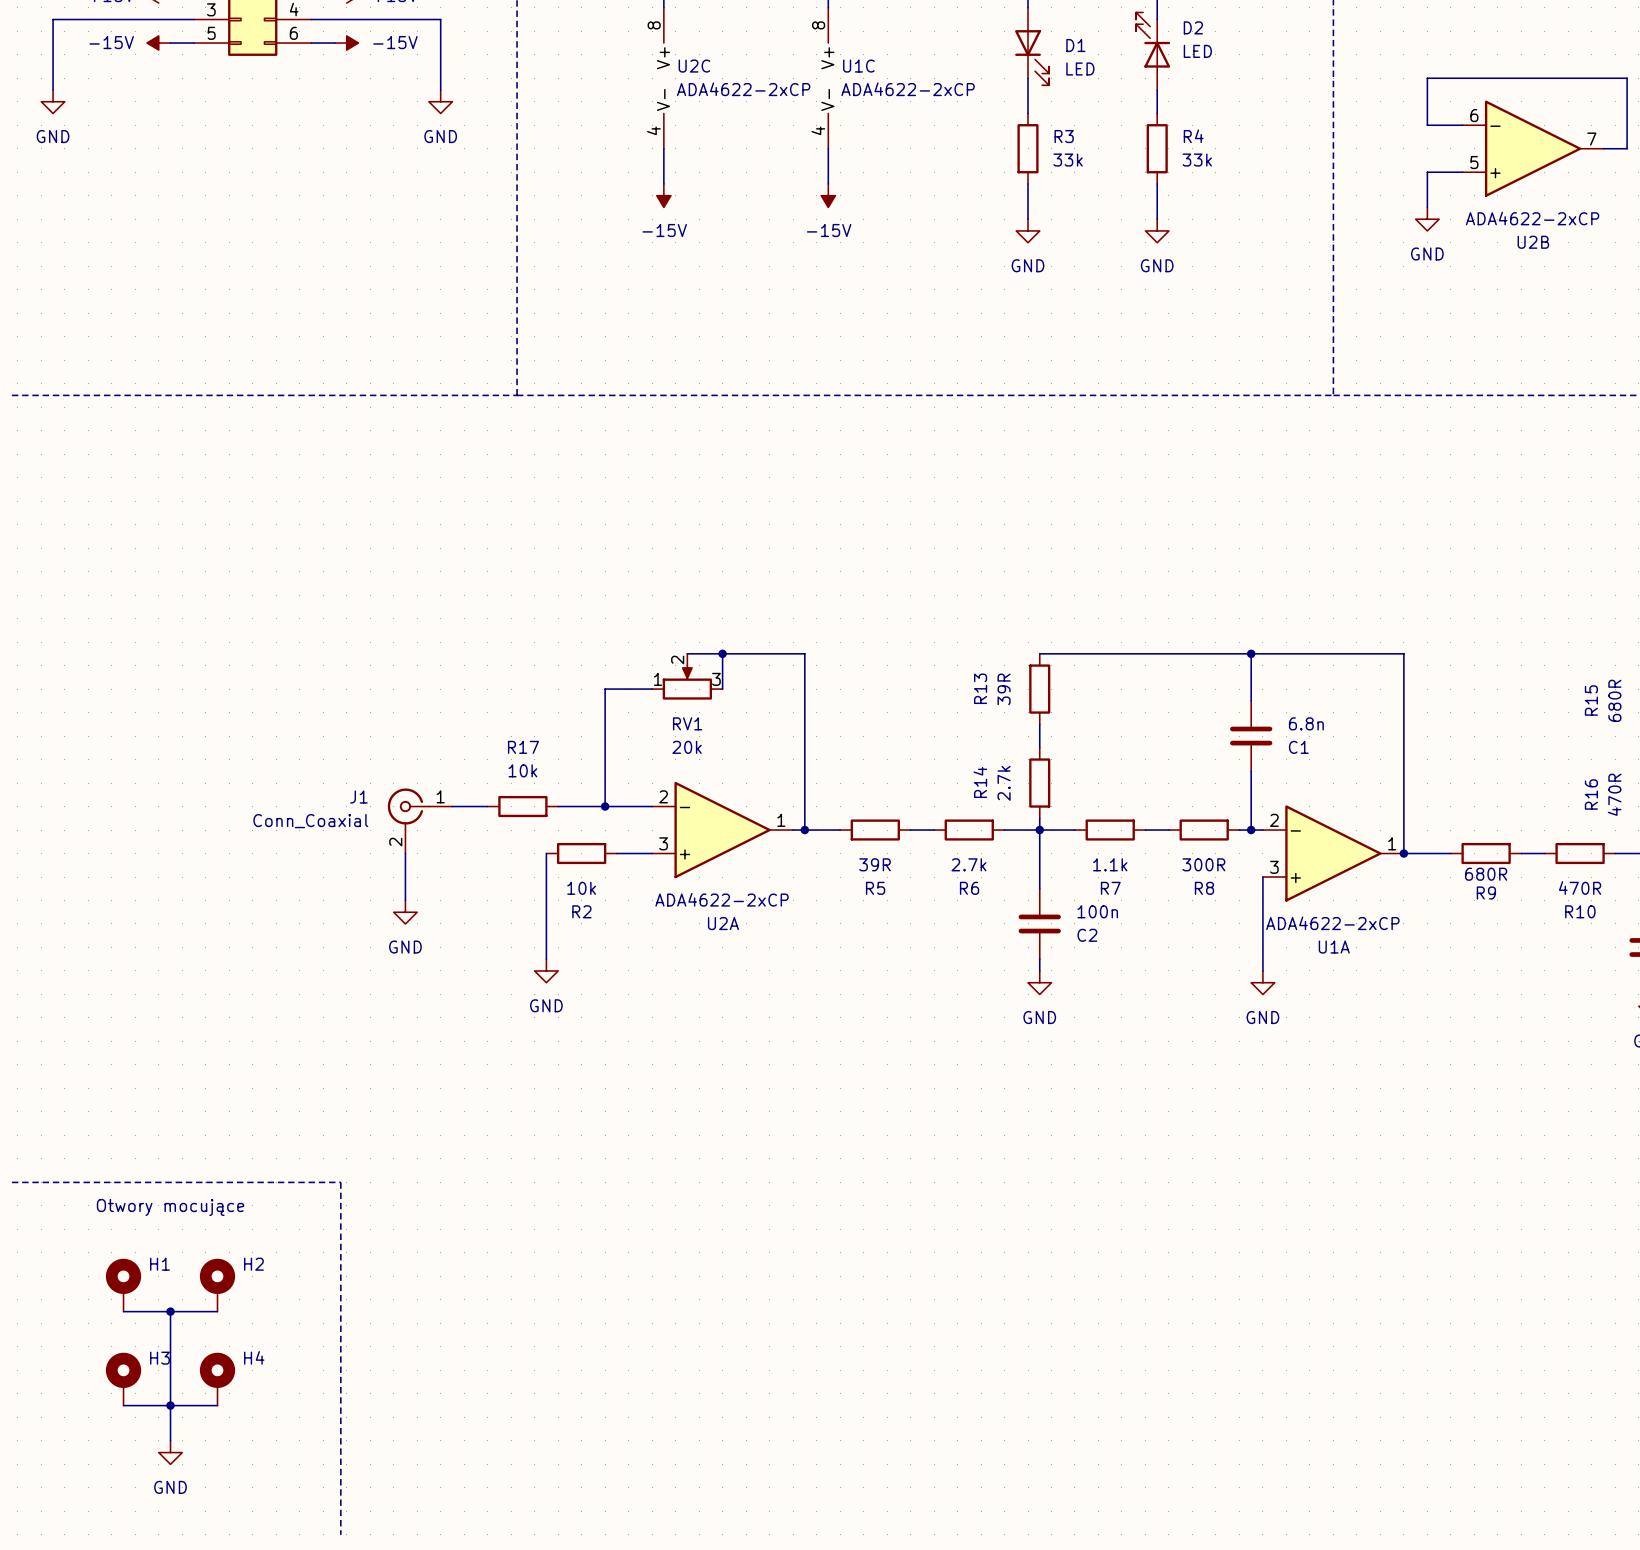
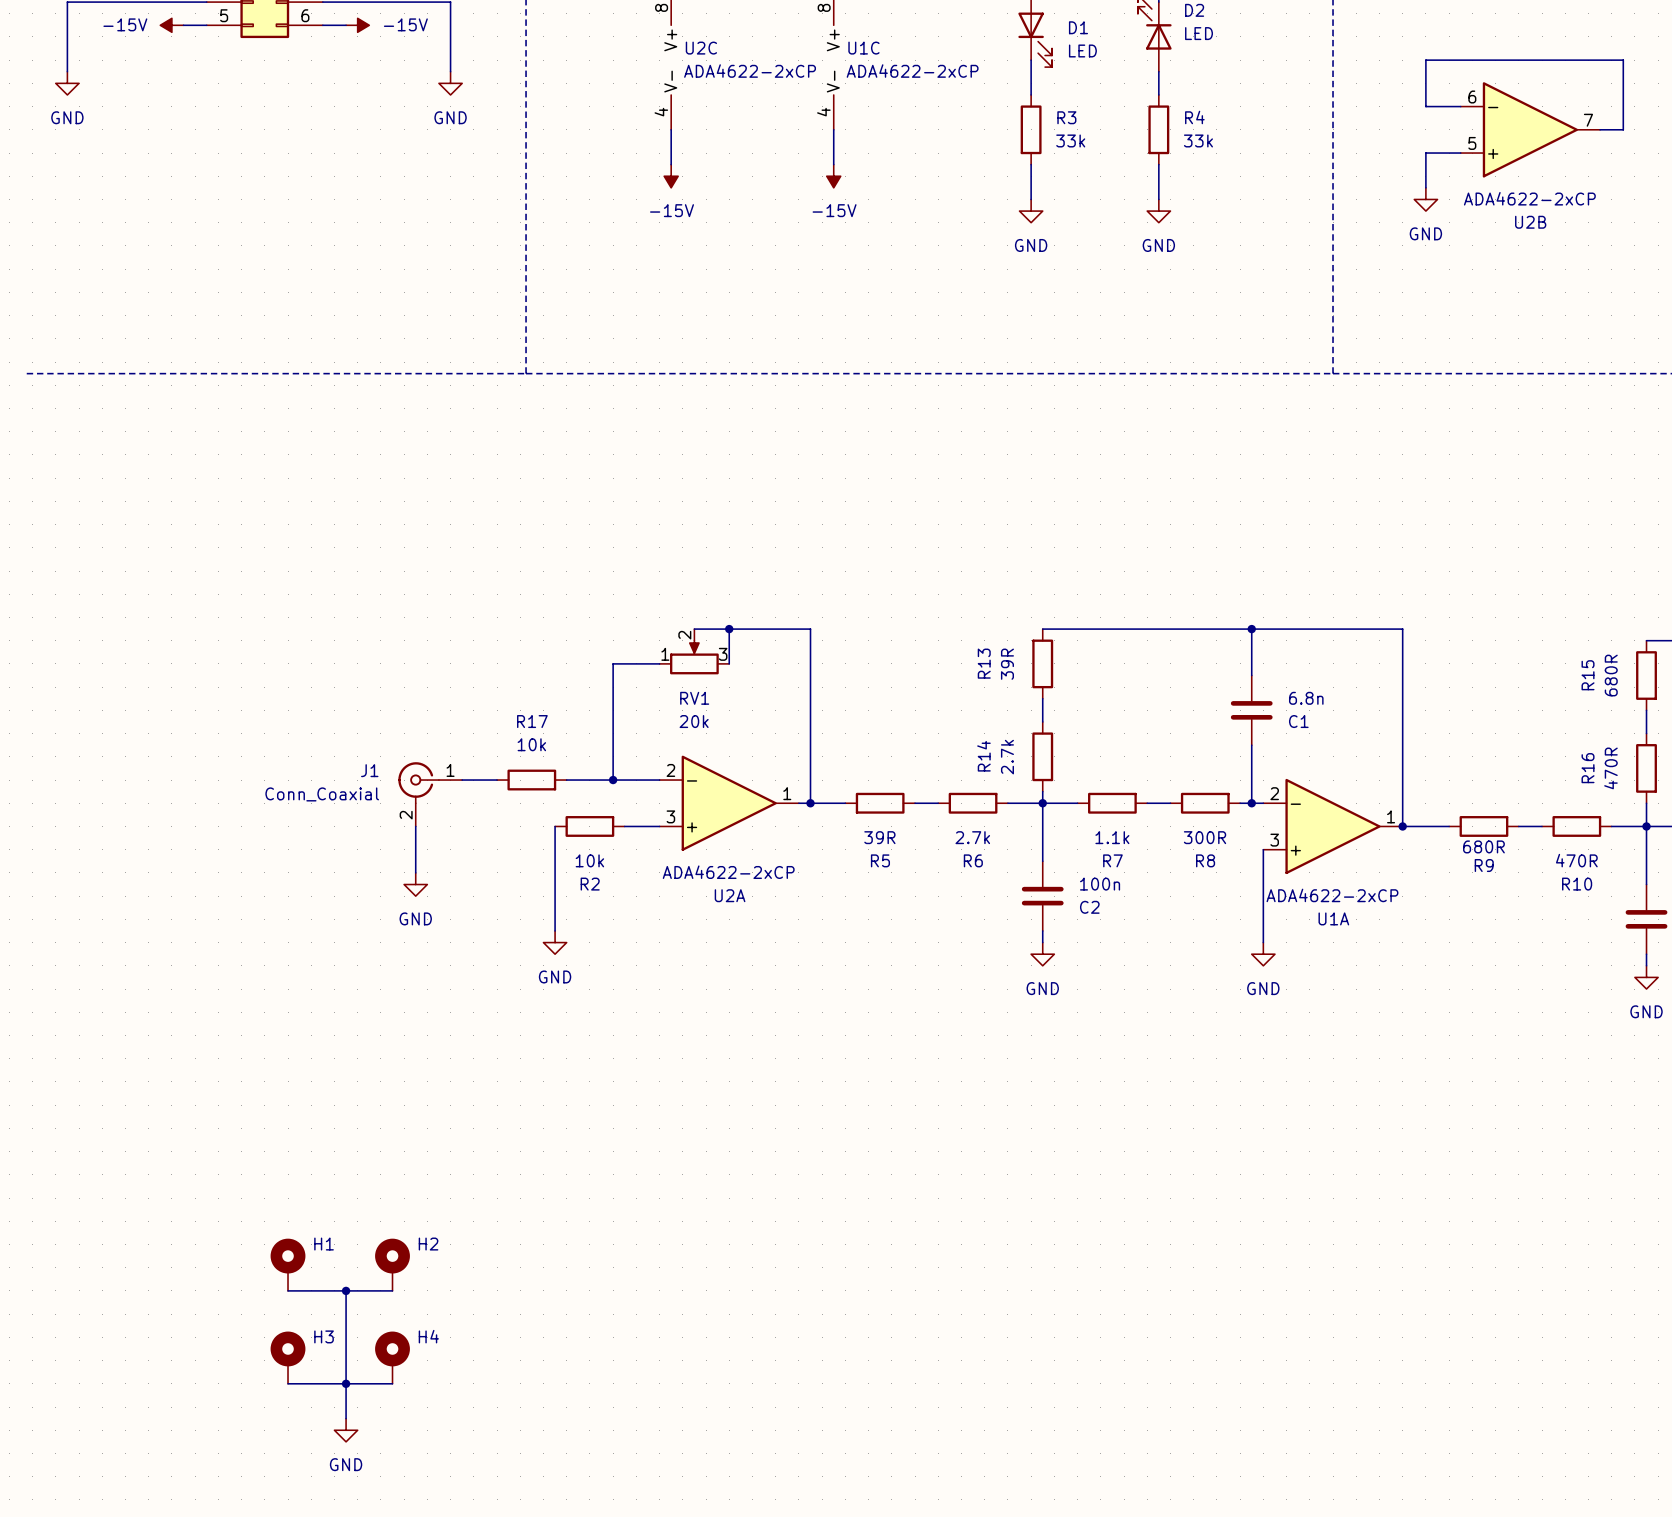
line: (11, 1182) (340, 1182) (340, 1534) -> none
text: Otwory mocujące (170, 1207) -> none
H1 position: (123, 1285) -> (288, 1264)
H2 position: (217, 1285) -> (392, 1264)
wire: (123, 1311) (217, 1311) -> none
wire: (170, 1311) (170, 1440) -> (346, 1290) (346, 1418)
junction: (170, 1311) -> none
wire: none -> (288, 1290) (392, 1290)
junction: none -> (346, 1290)
H3 position: (123, 1379) -> (288, 1357)
H4 position: (217, 1379) -> (392, 1357)
wire: (123, 1405) (217, 1405) -> none
junction: (170, 1405) -> none
wire: none -> (288, 1383) (392, 1383)
junction: none -> (346, 1383)
power symbol position: GND (170, 1452) -> GND (346, 1430)

